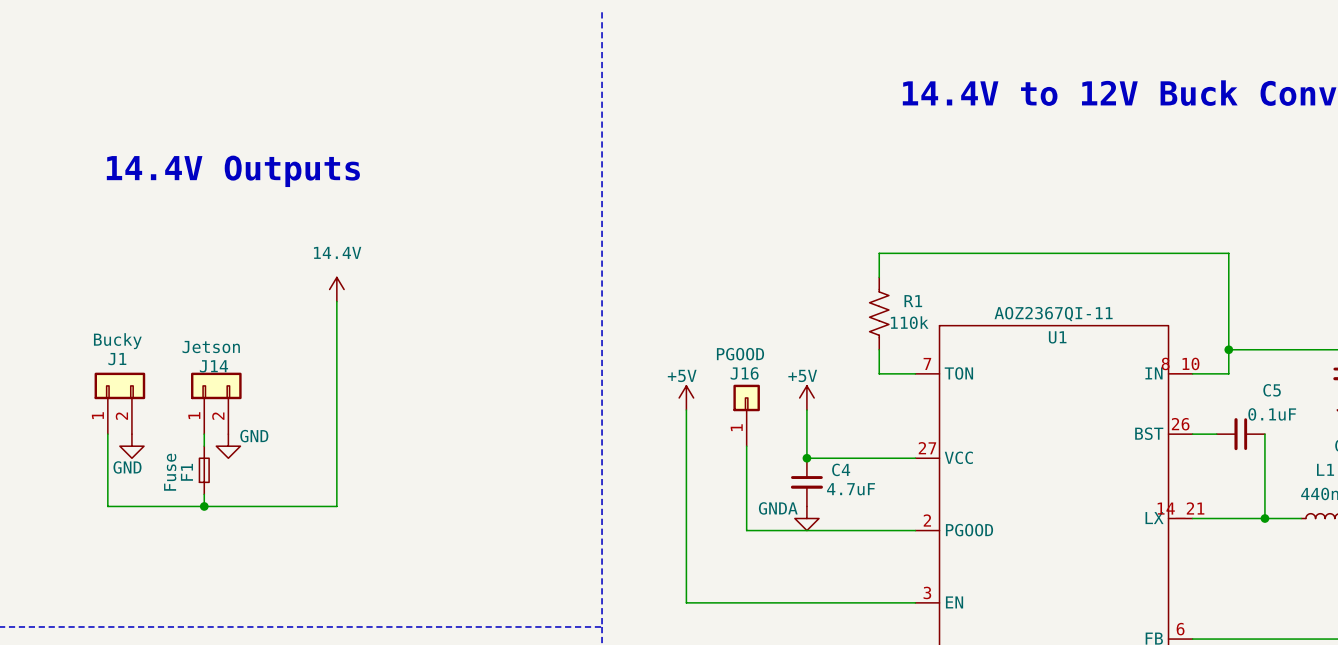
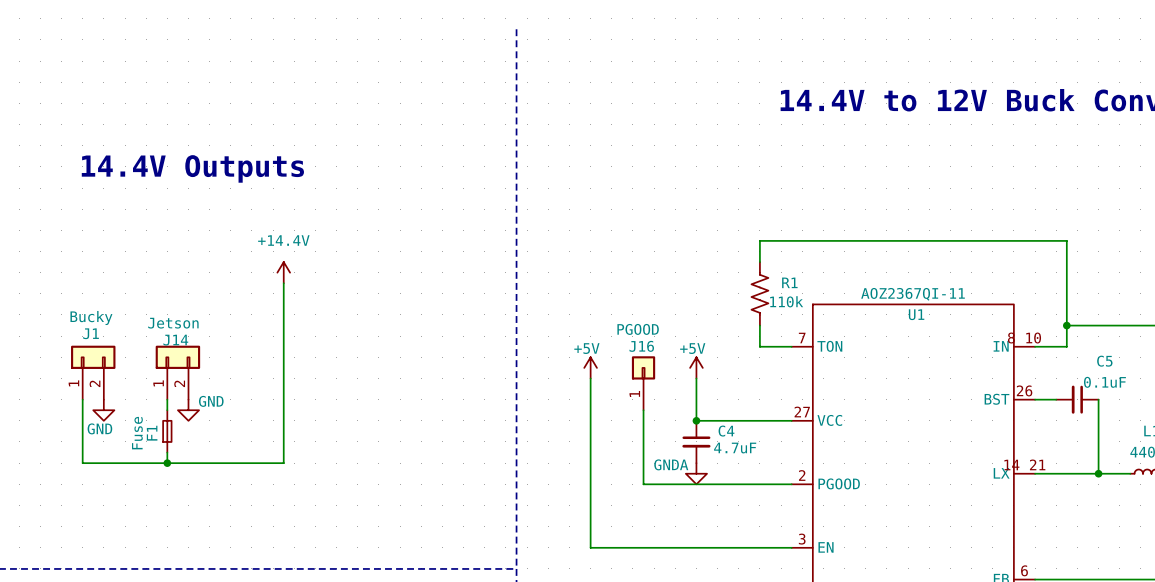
power symbol: 14.4V (336, 289) -> +14.4V (283, 272)

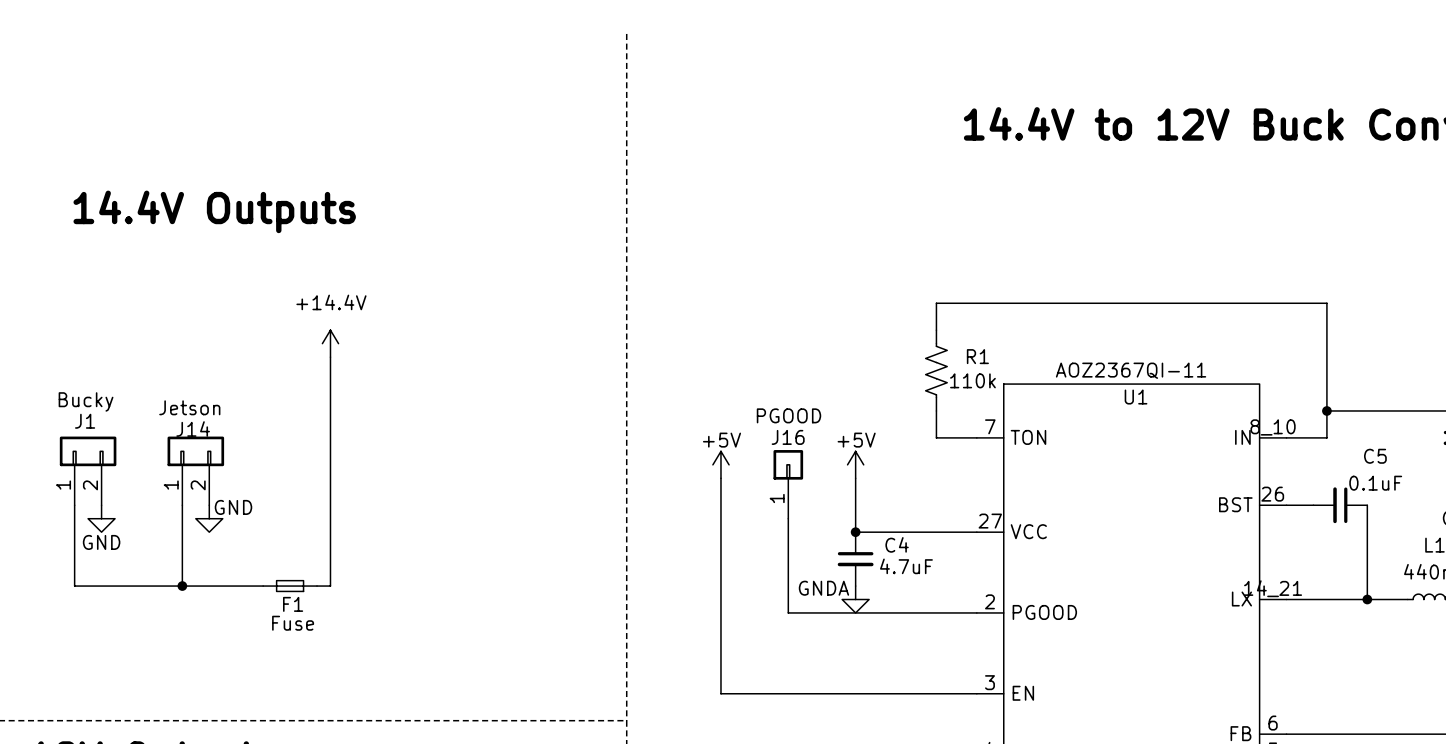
F1 rotation: 0° (167, 431) -> 90° clockwise (290, 586)
F1 position: (167, 431) -> (290, 586)
F1 value position: Fuse (137, 433) -> Fuse (293, 623)
F1 name position: F1 (152, 433) -> F1 (293, 604)

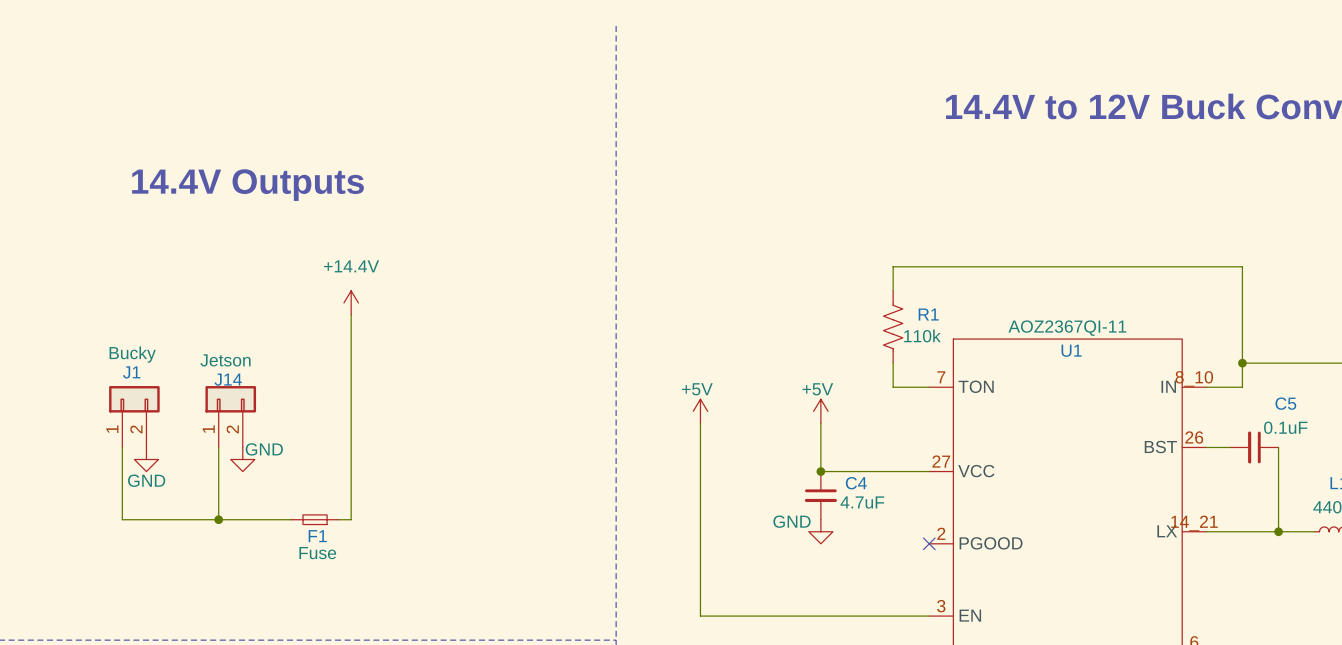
J16: PGOOD (788, 484) -> none
wire: (788, 518) (788, 612) (976, 612) -> none
power symbol: GNDA (855, 599) -> GND (820, 531)
no-connect mark: none -> (929, 543)

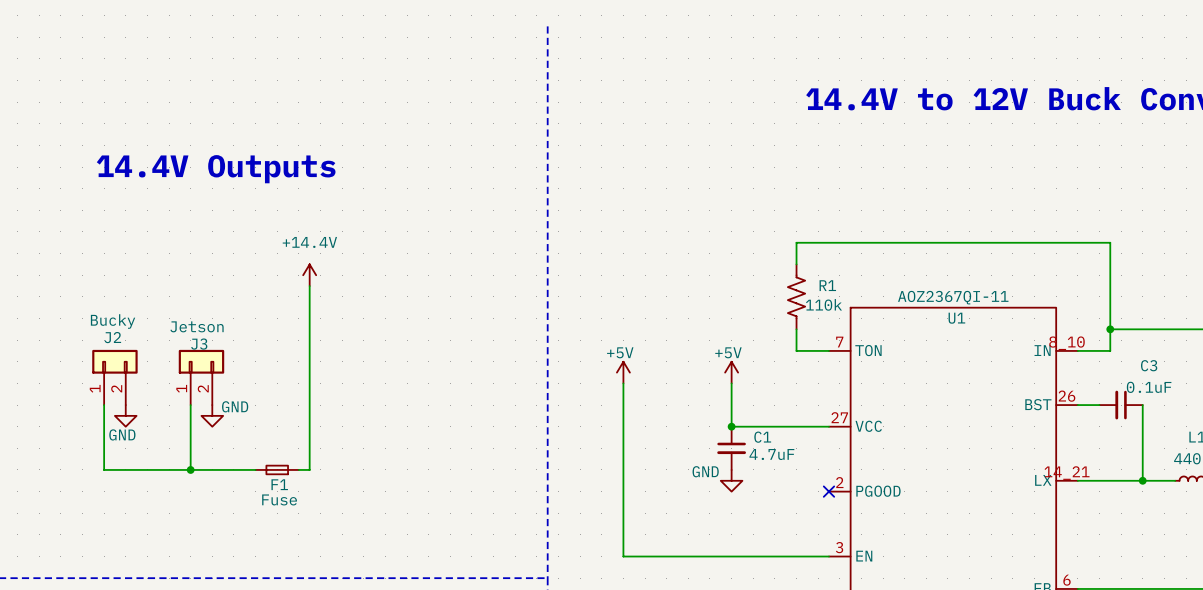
J1 name: J1 (131, 372) -> J2 (112, 337)
J14 name: J14 (228, 379) -> J3 (199, 344)
C5 name: C5 (1285, 403) -> C3 (1149, 365)
C4 name: C4 (856, 483) -> C1 (762, 437)

